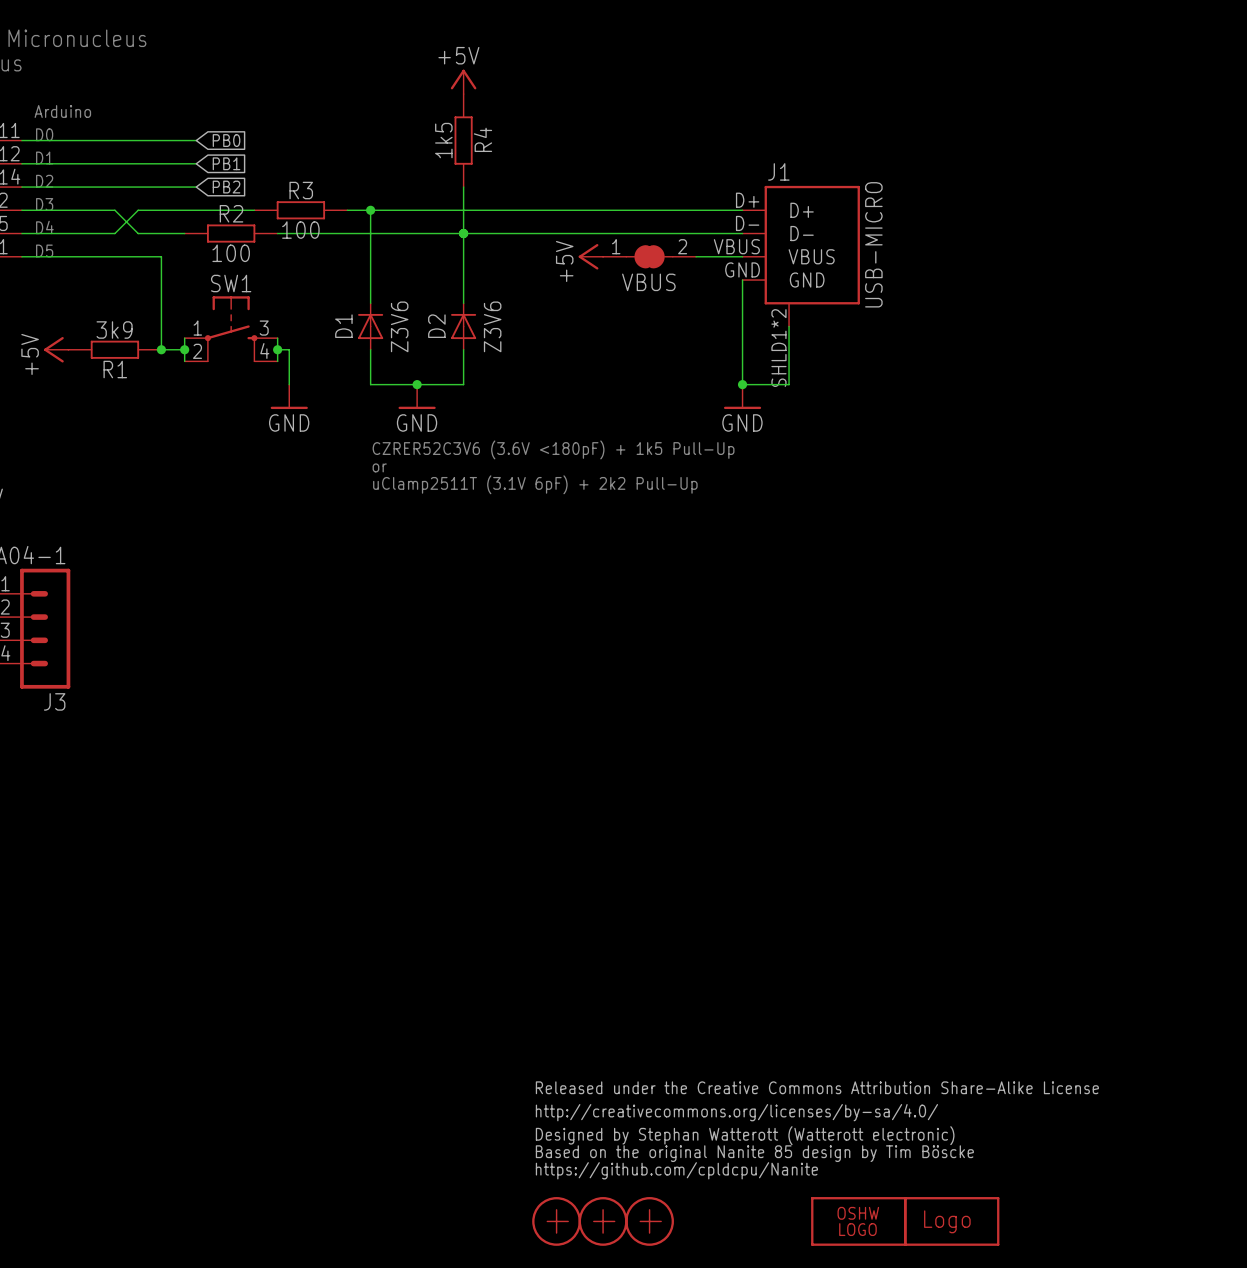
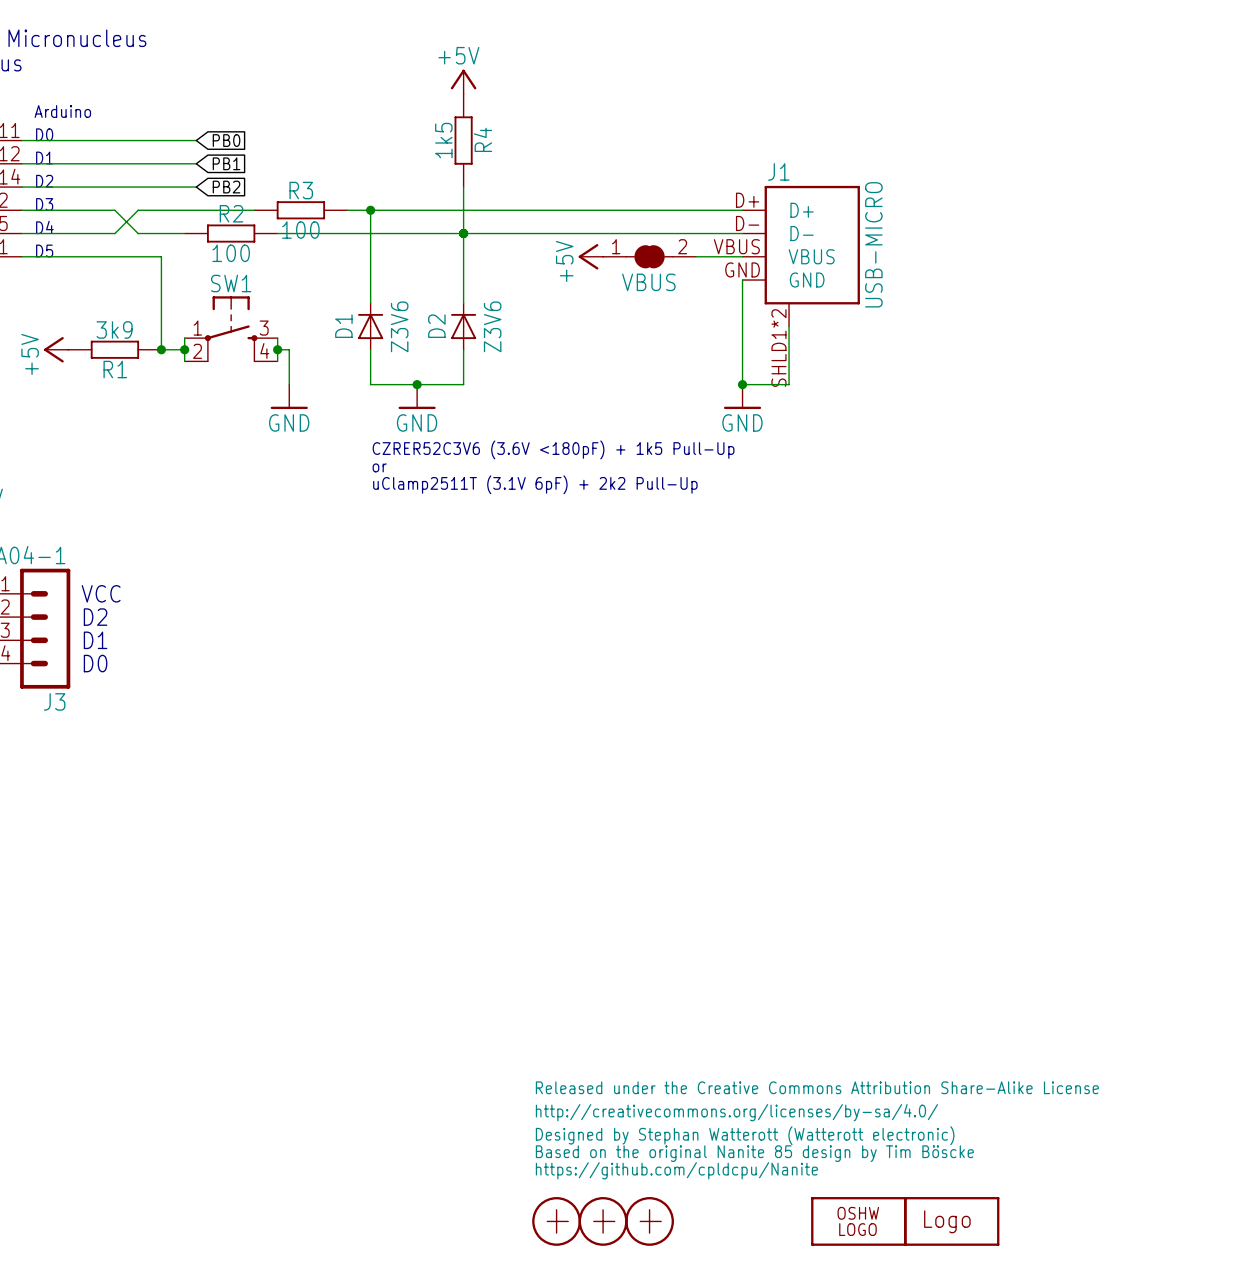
text: none -> VCC (101, 593)
text: none -> D2 (95, 617)
text: none -> D1 (95, 640)
text: none -> D0 (95, 663)

